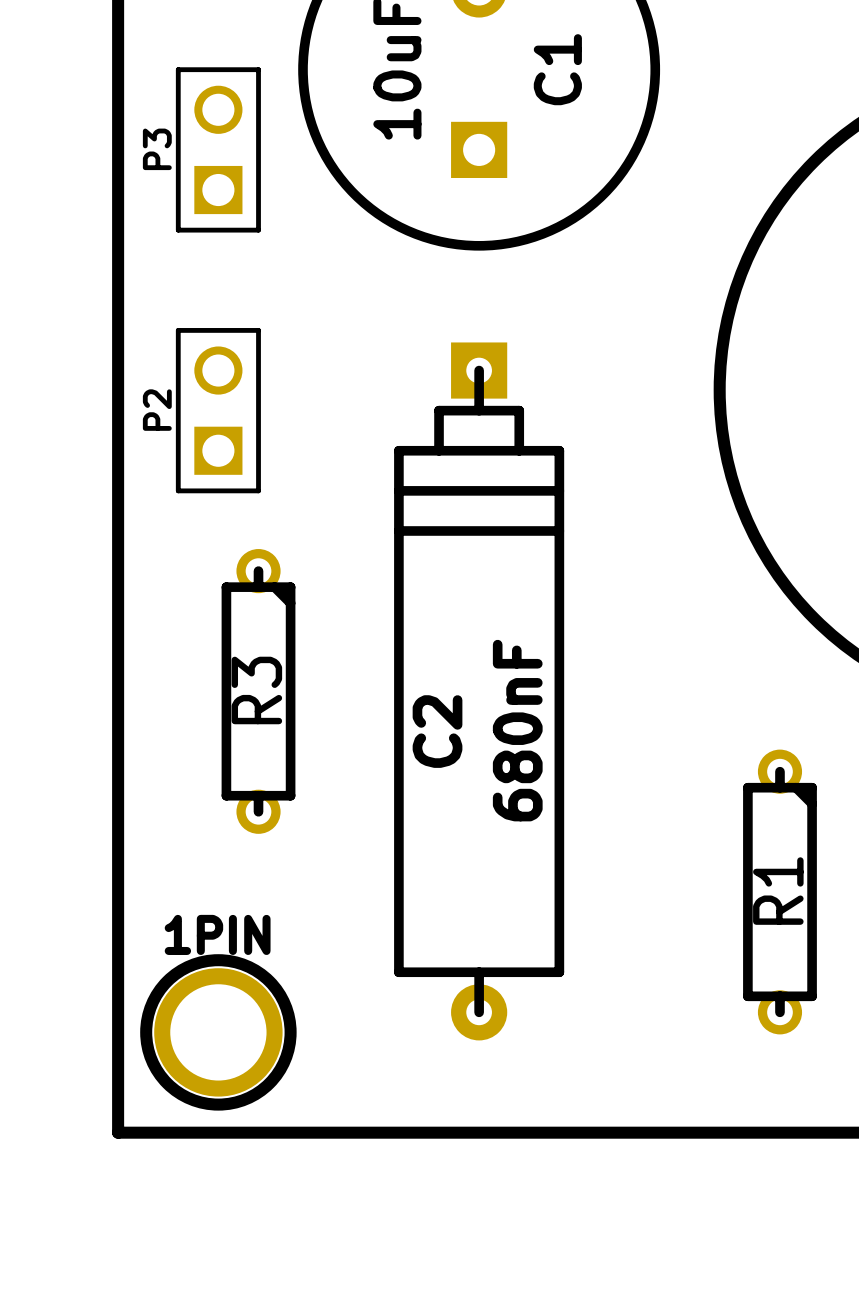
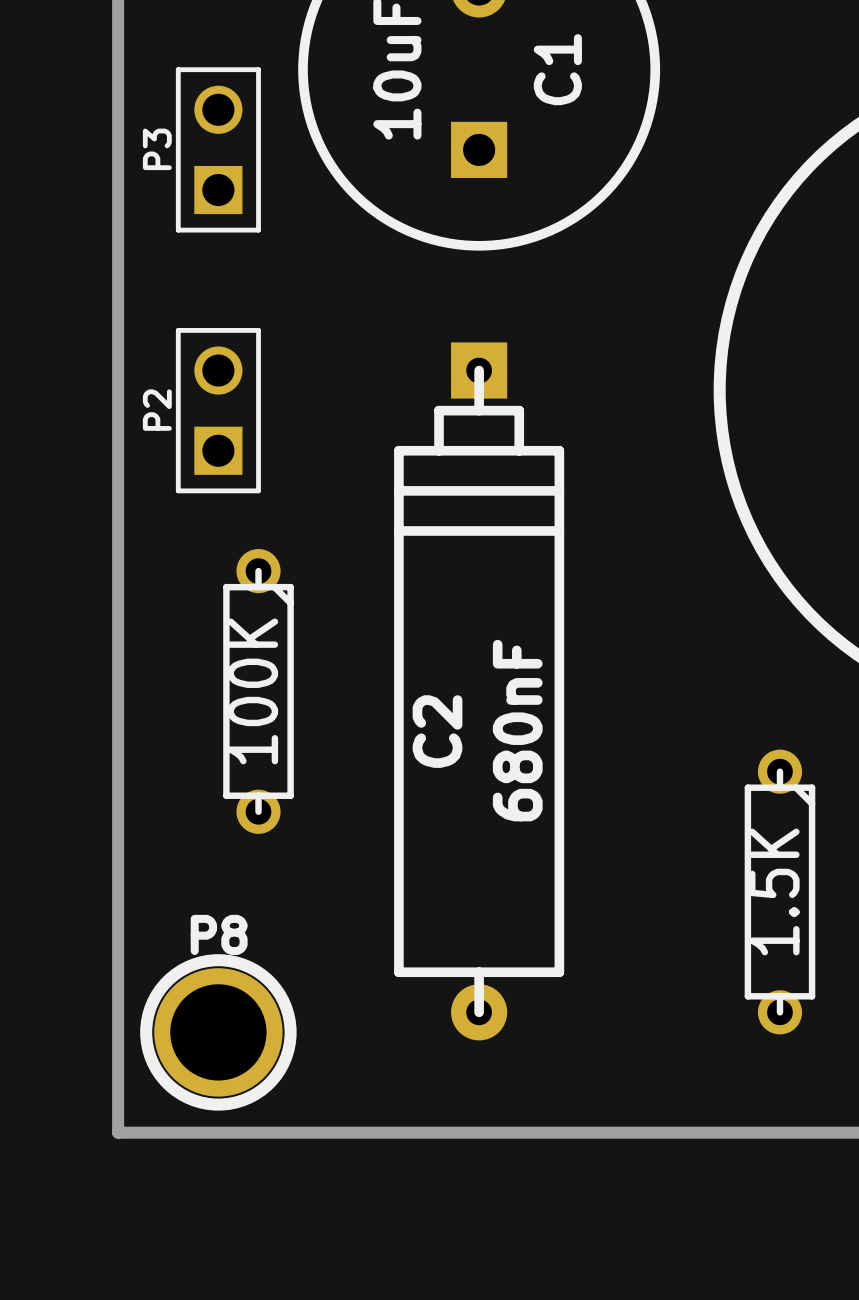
R3: (258, 691) -> none
part: none -> 100K (258, 691)
R1: (779, 892) -> none
part: none -> 1.5K (779, 892)
1PIN name: 1PIN (217, 934) -> P8 (219, 934)

